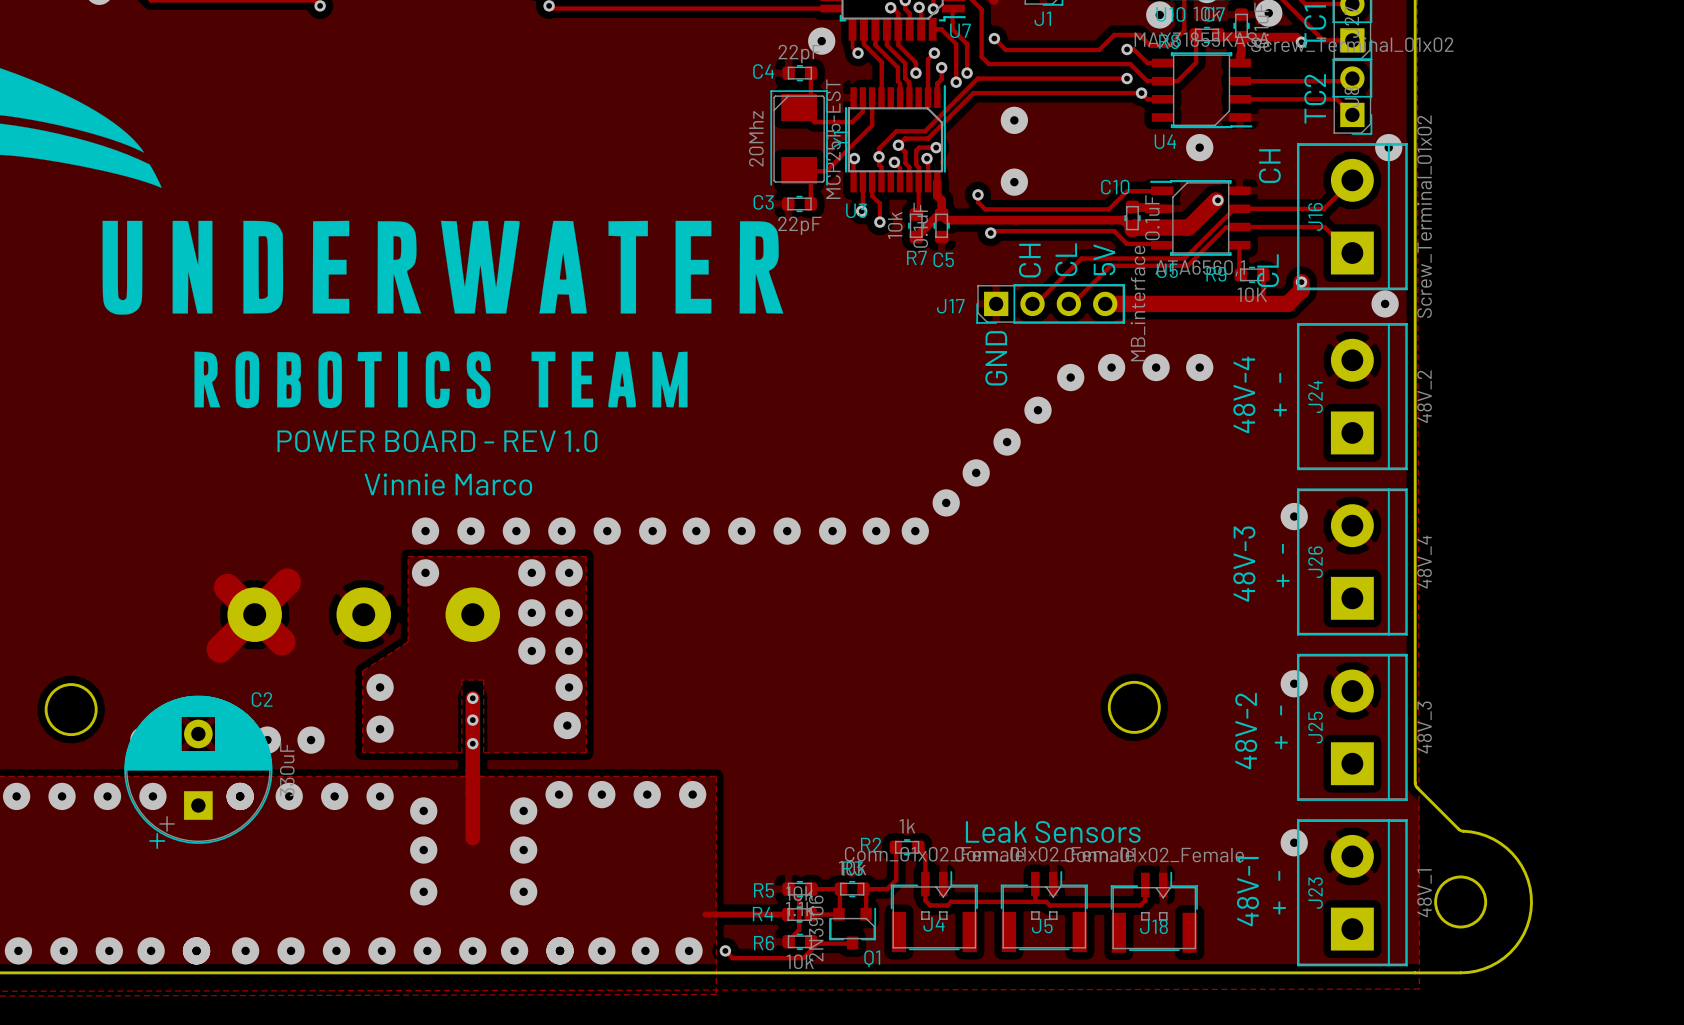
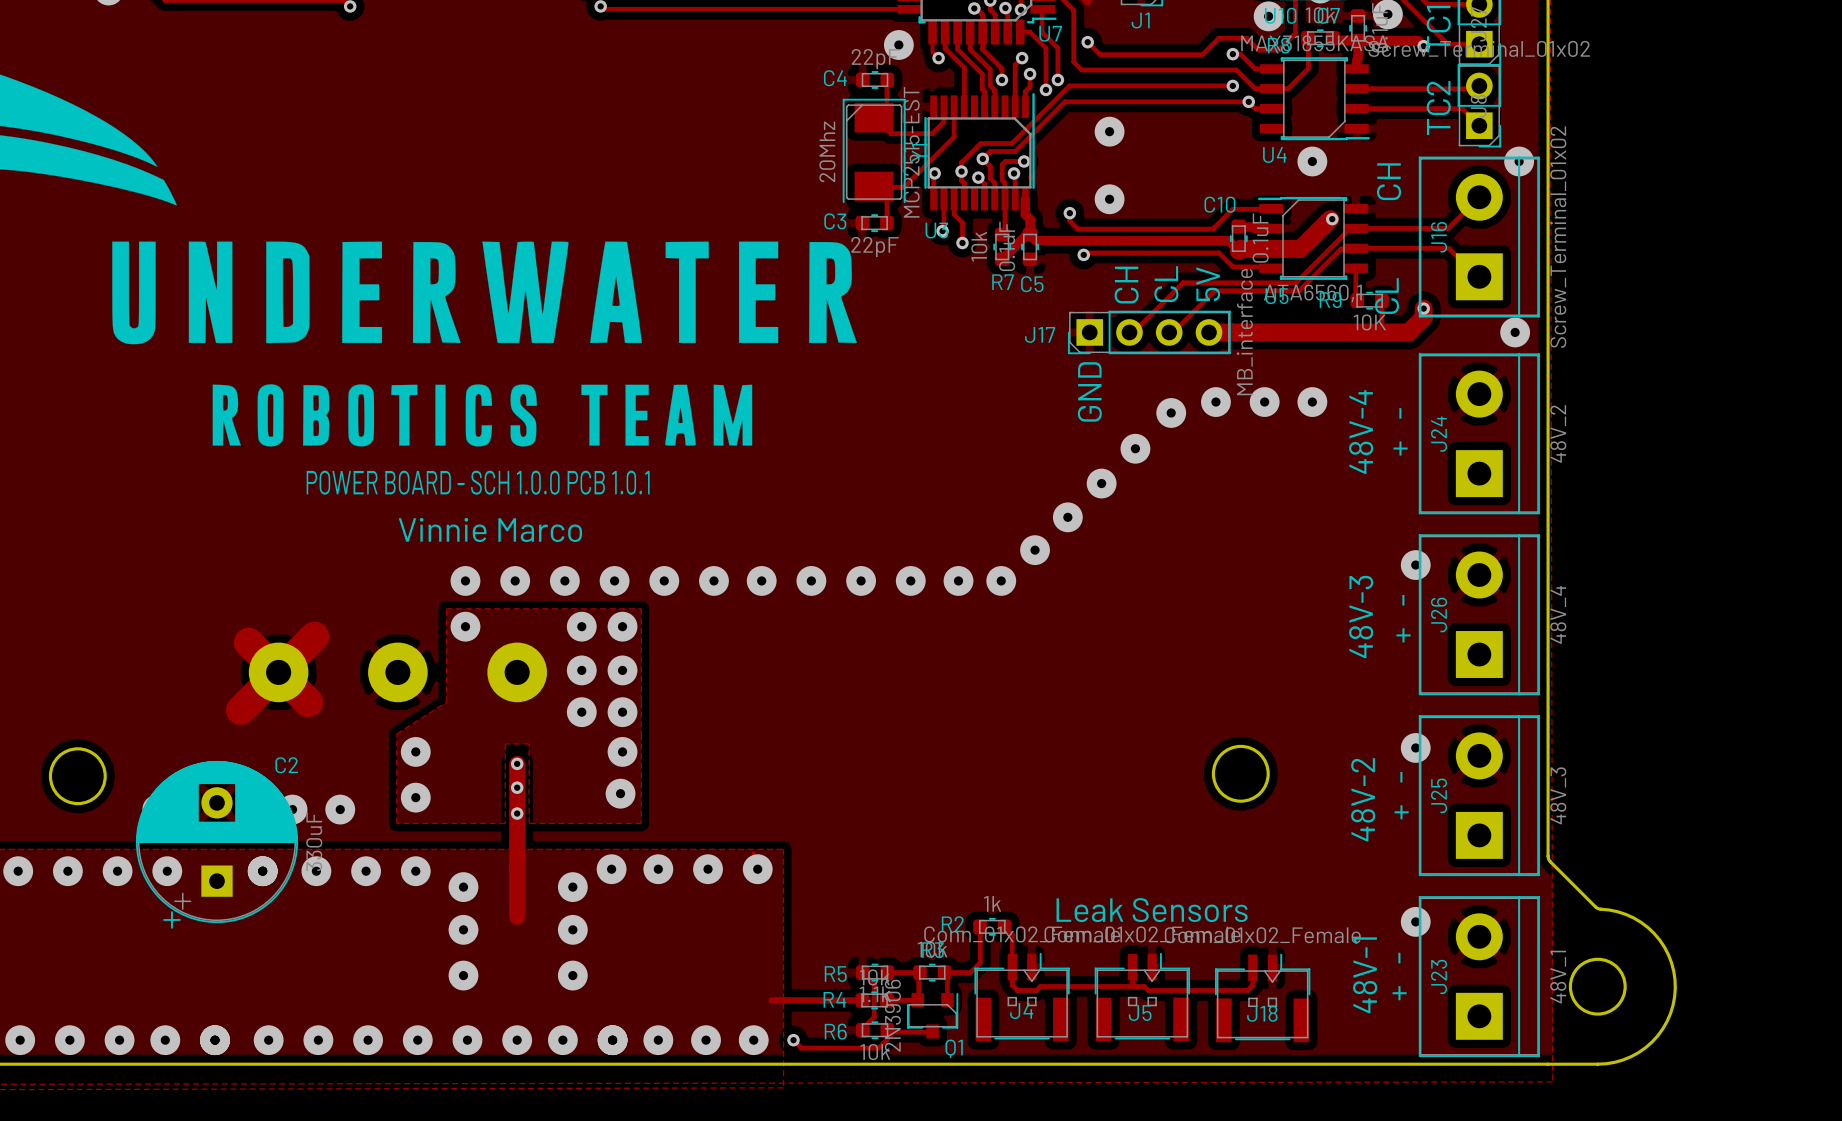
text: POWER BOARD - REV 1.0 (437, 441) -> POWER BOARD - SCH 1.0.0 PCB 1.0.1 (478, 482)

